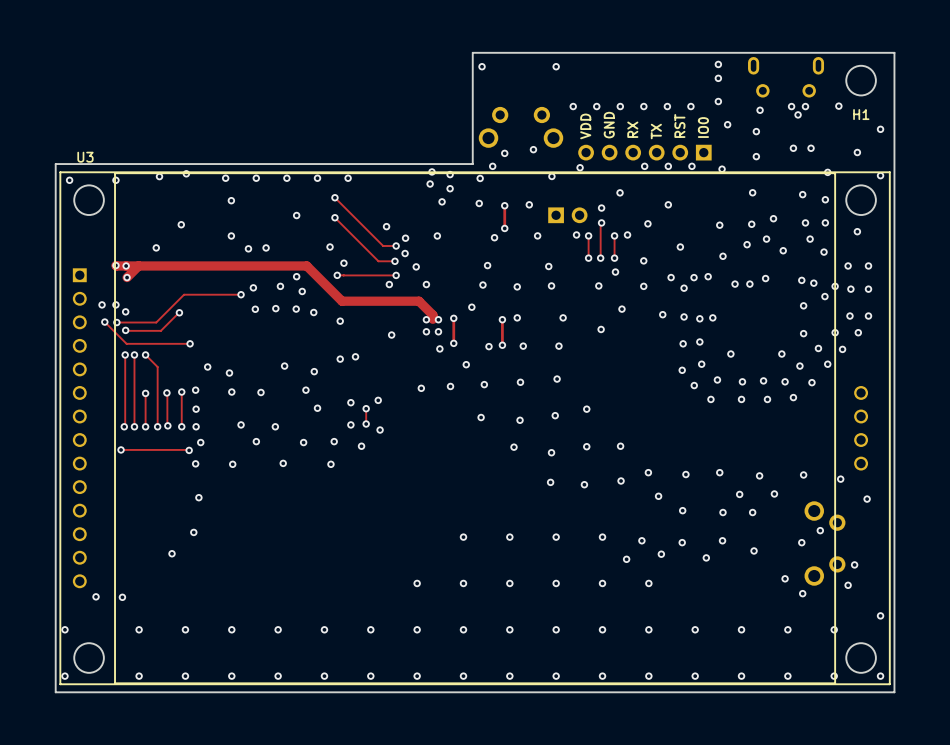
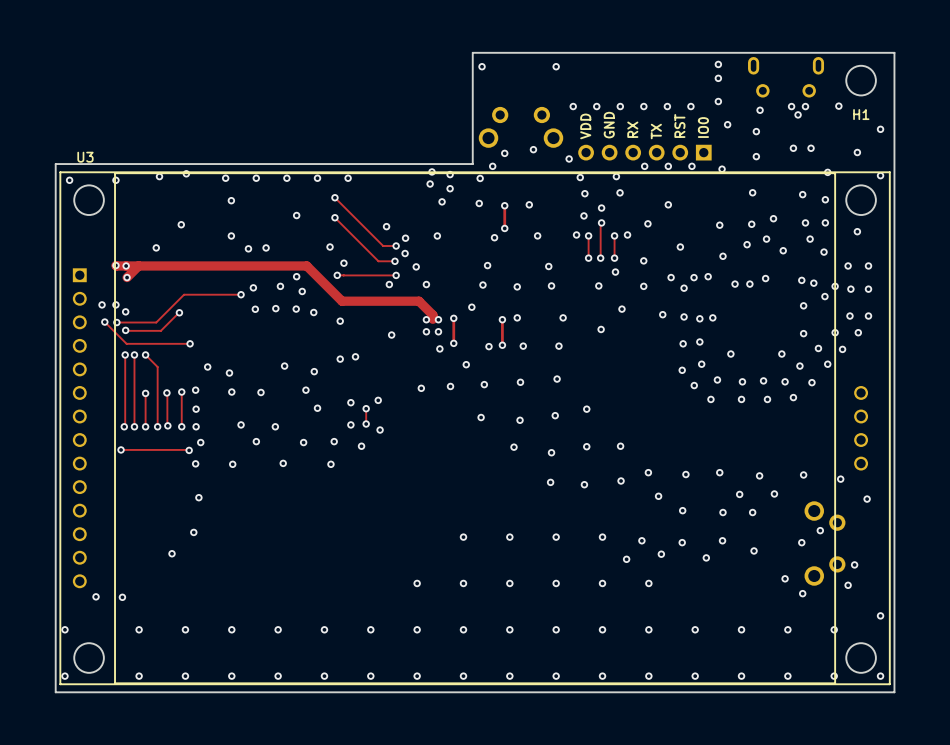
via: none -> (569, 158)
via: (580, 167) -> none
via: (551, 176) -> none
via: none -> (616, 176)
via: none -> (580, 177)
via: none -> (584, 193)
part: (567, 215) -> none
via: none -> (583, 215)

